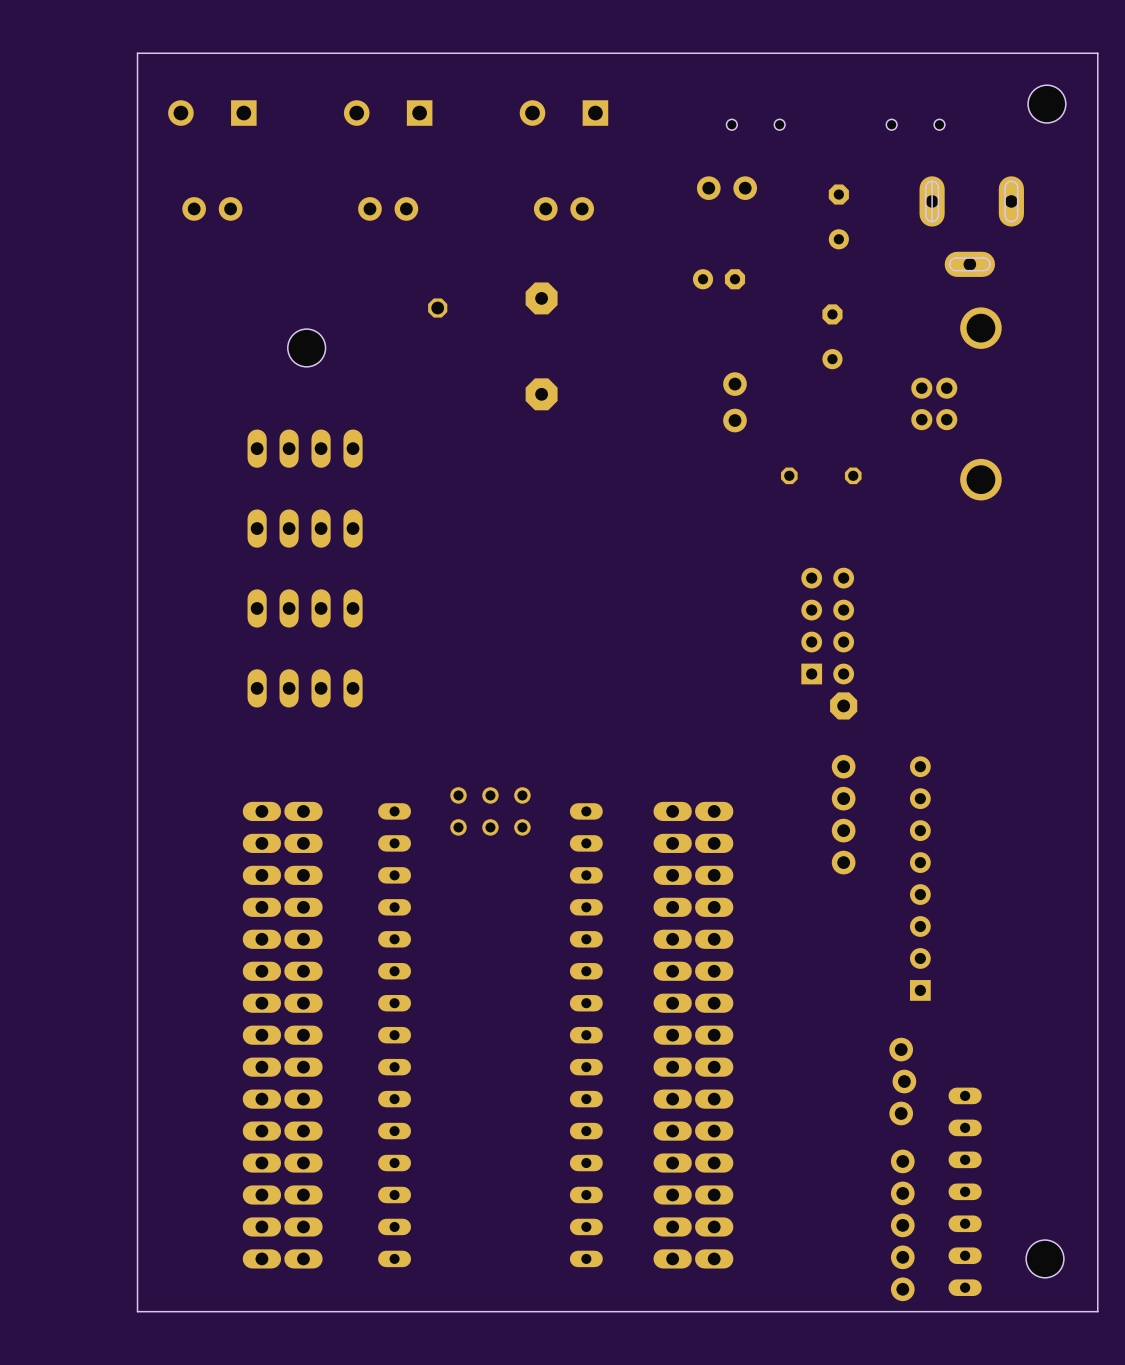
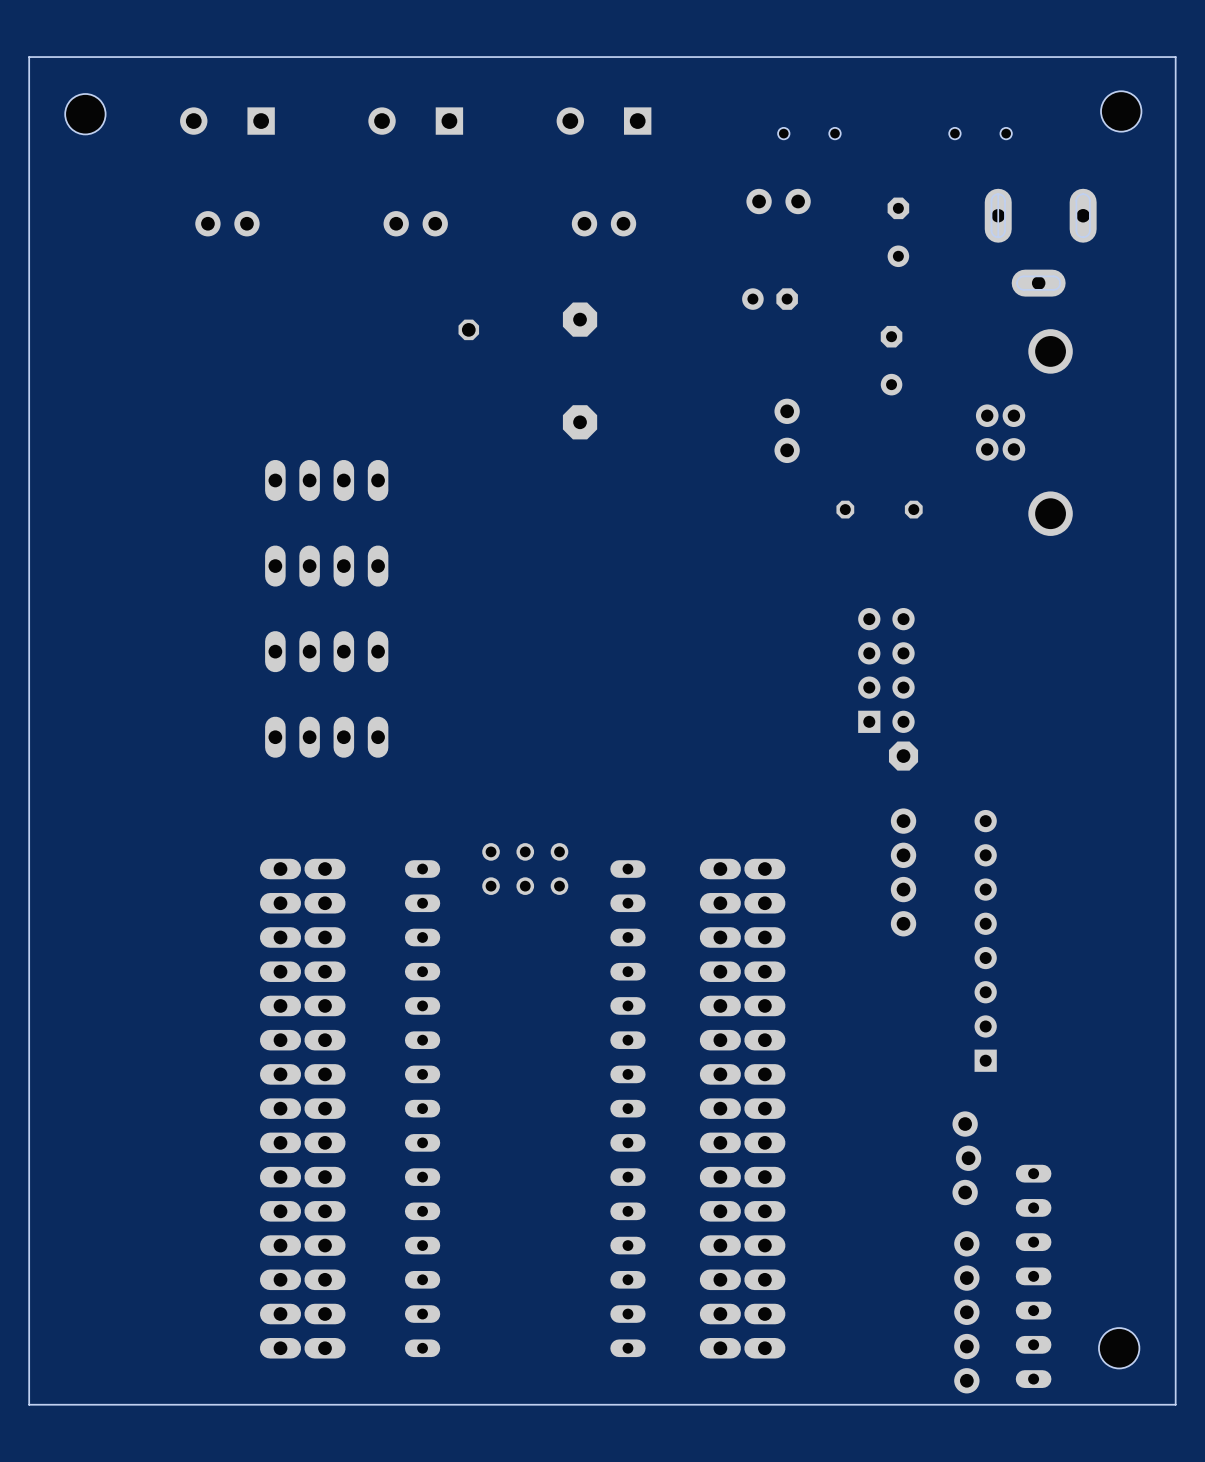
board edge: (137, 53) (137, 1311) -> (147, 57) (29, 57) (29, 1404) (147, 1404)
part: none -> (85, 114)
part: (306, 347) -> none

